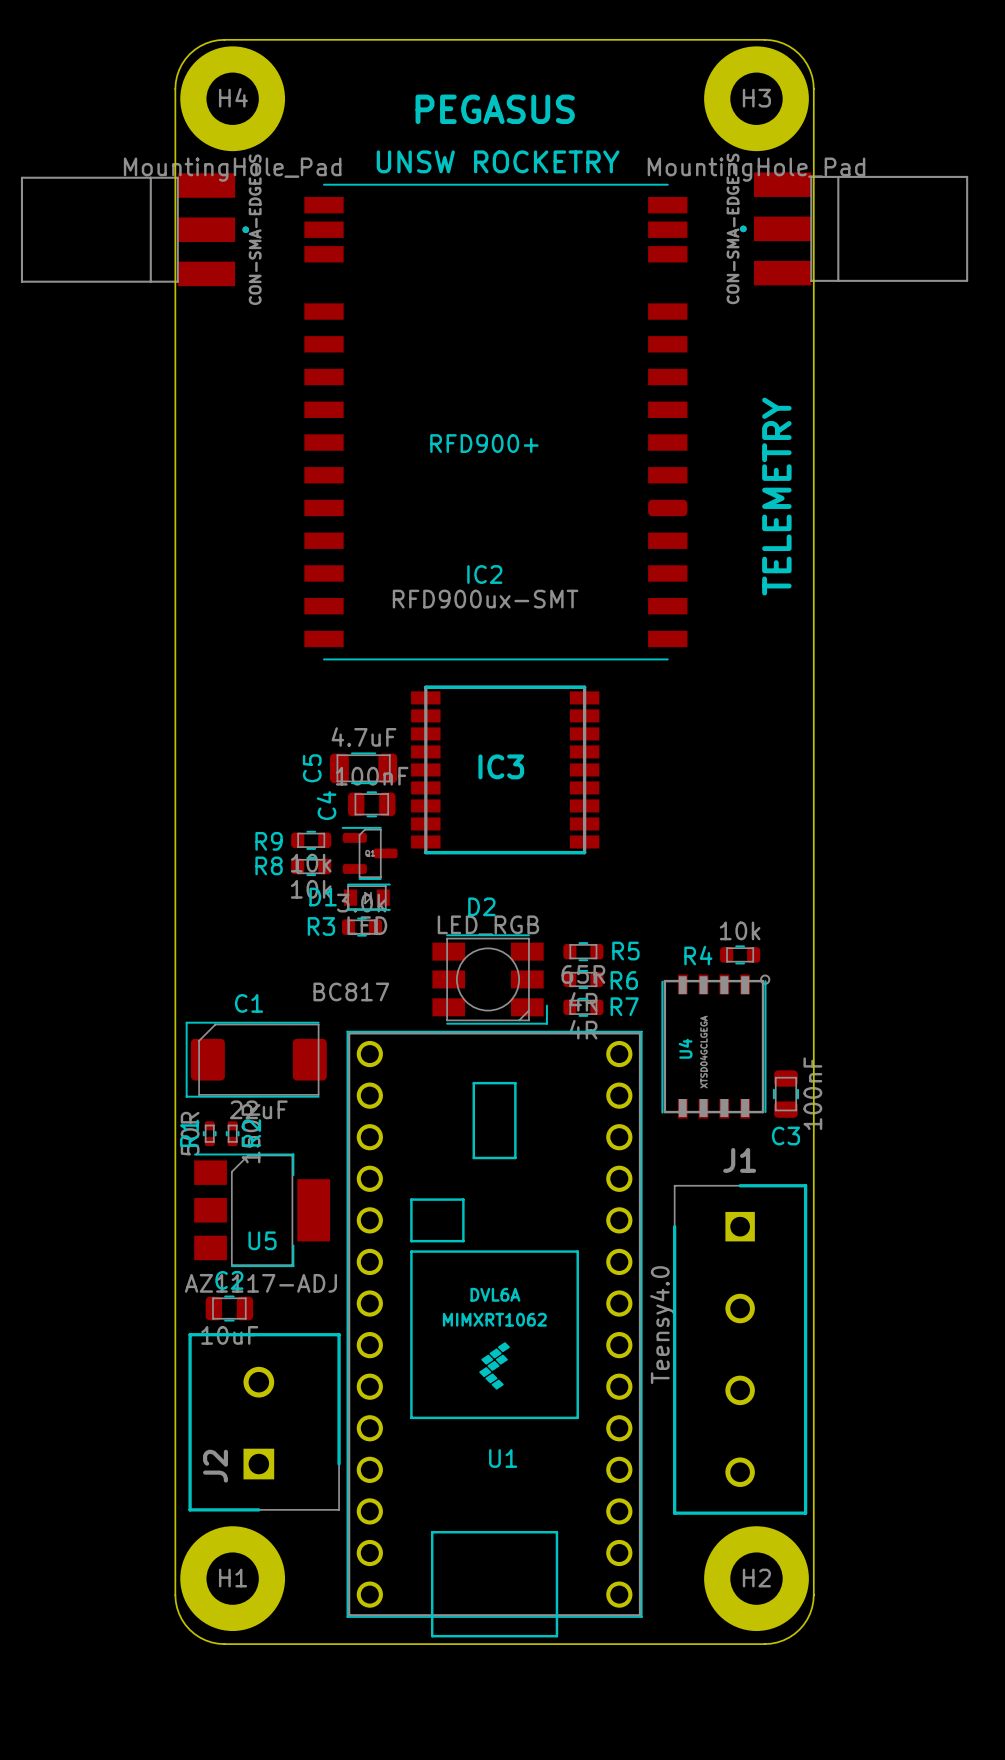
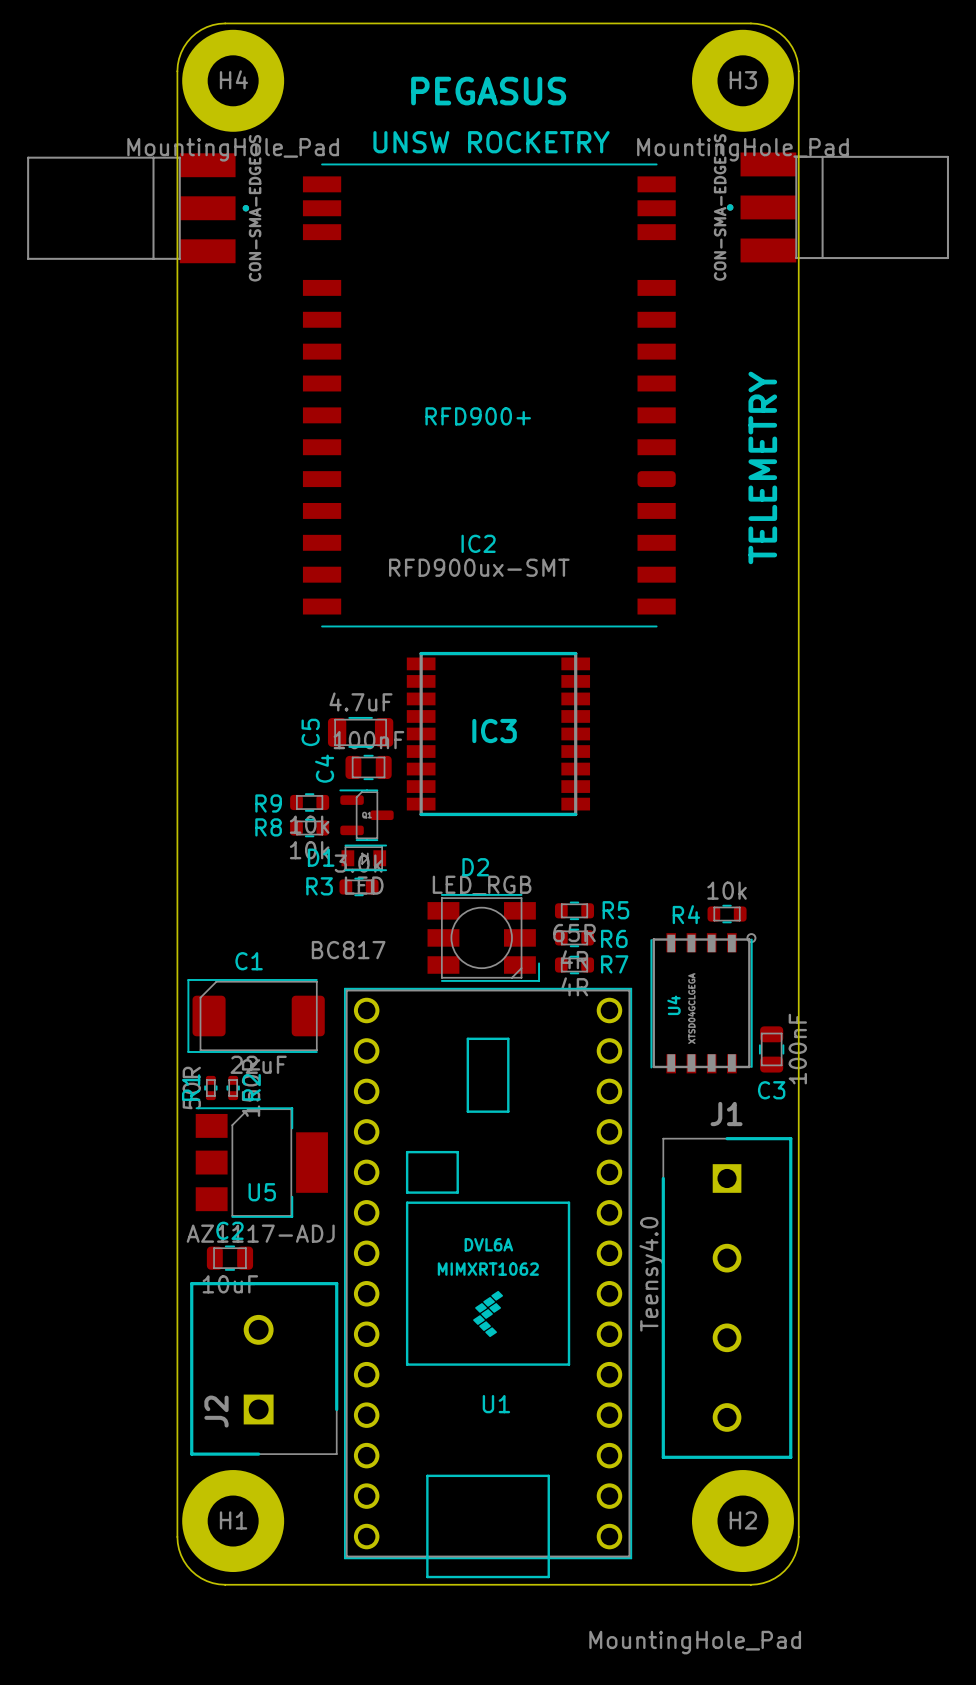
H2 value: none -> MountingHole_Pad (695, 1642)

